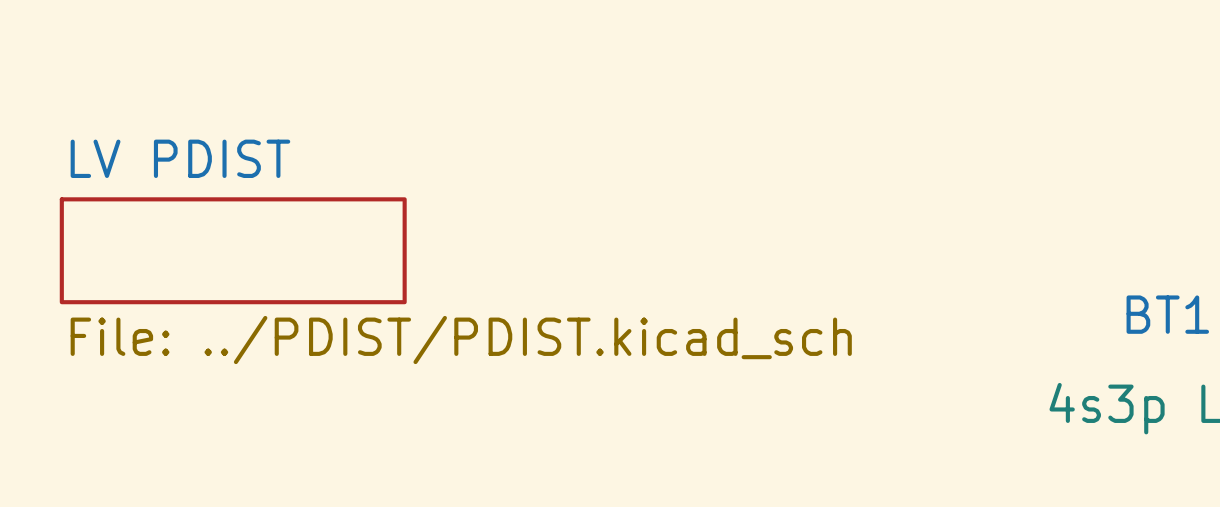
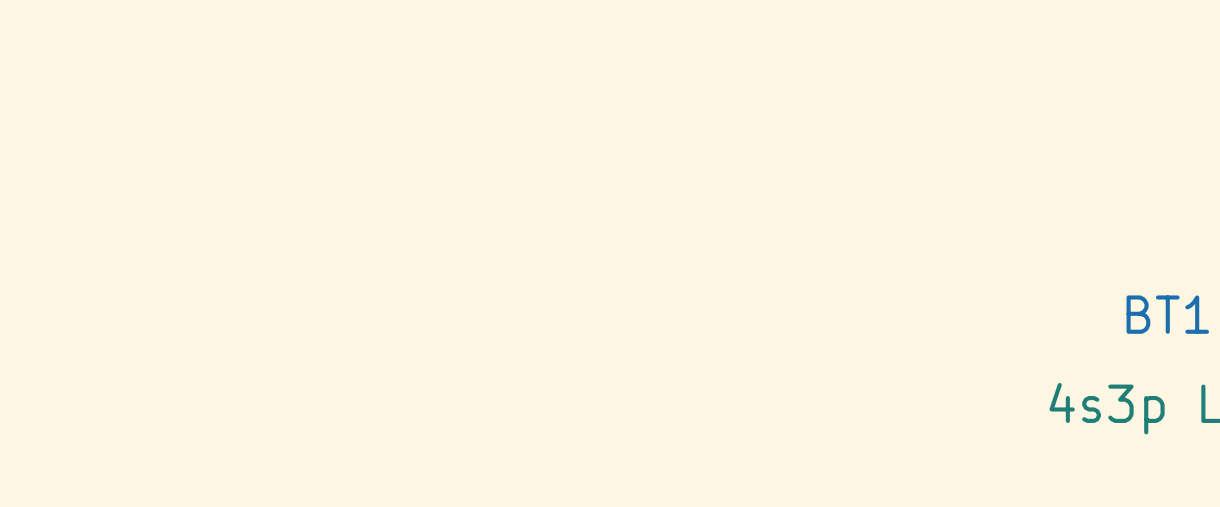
sheet LV PDIST: File: ../PDIST/PDIST.kicad_sch (233, 250) -> none

